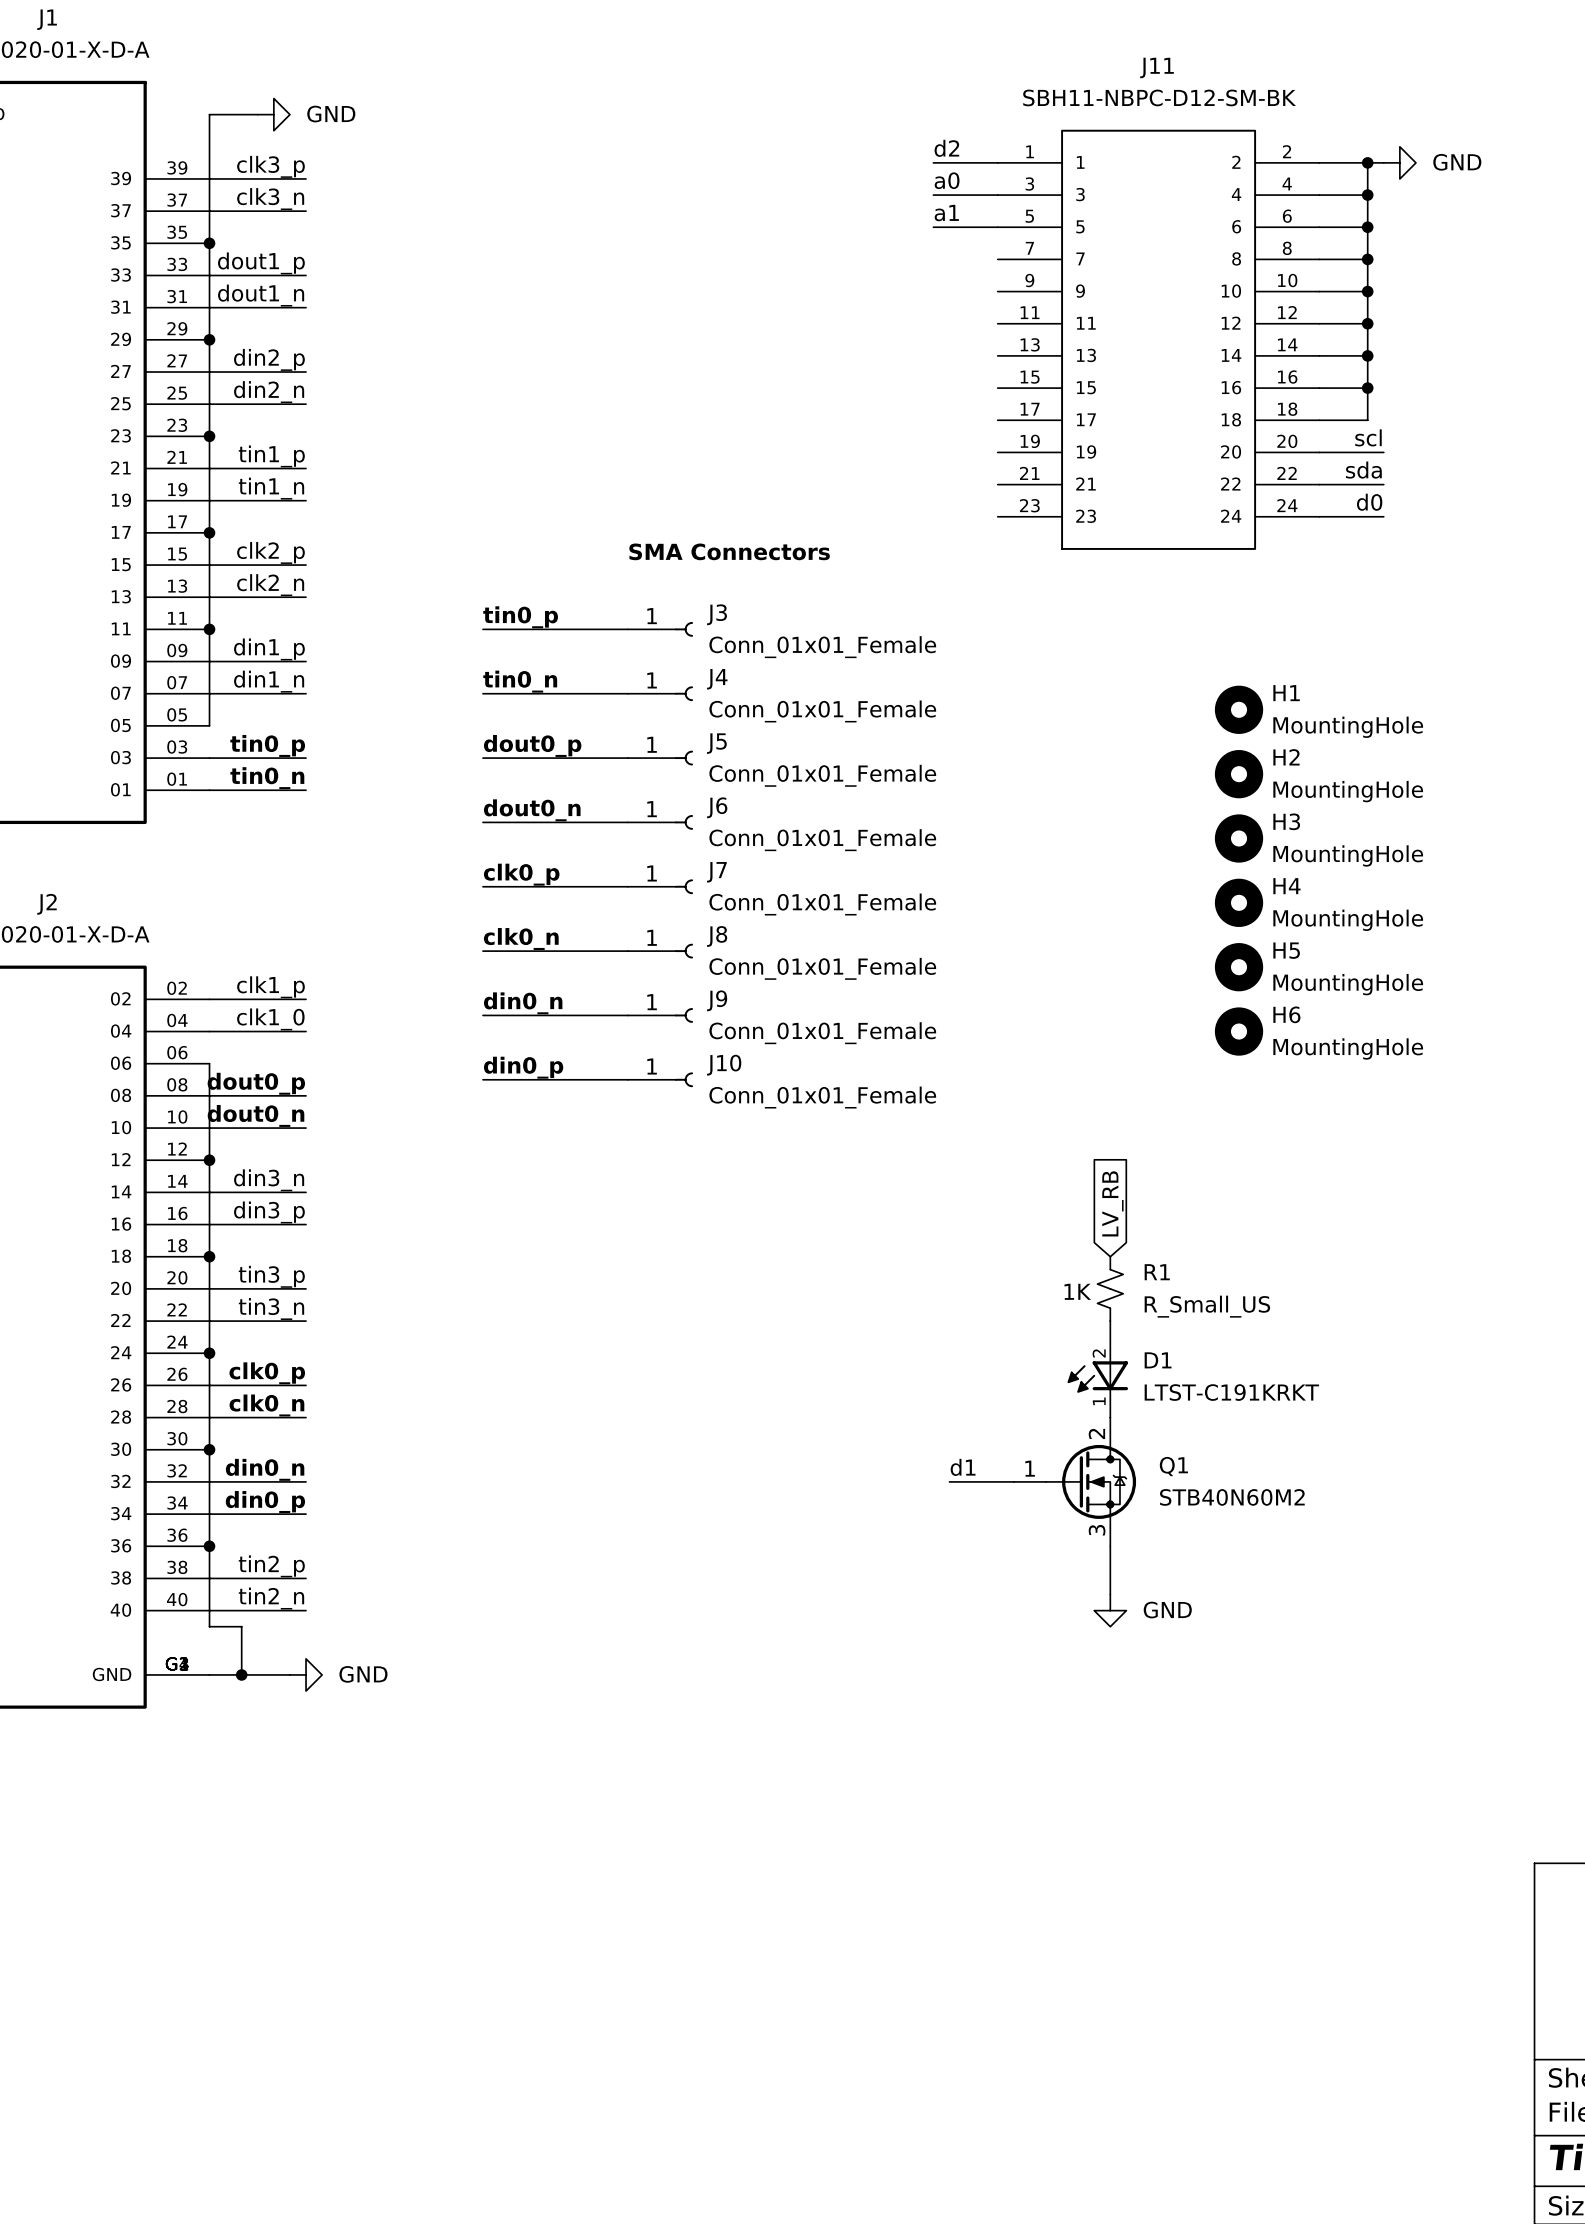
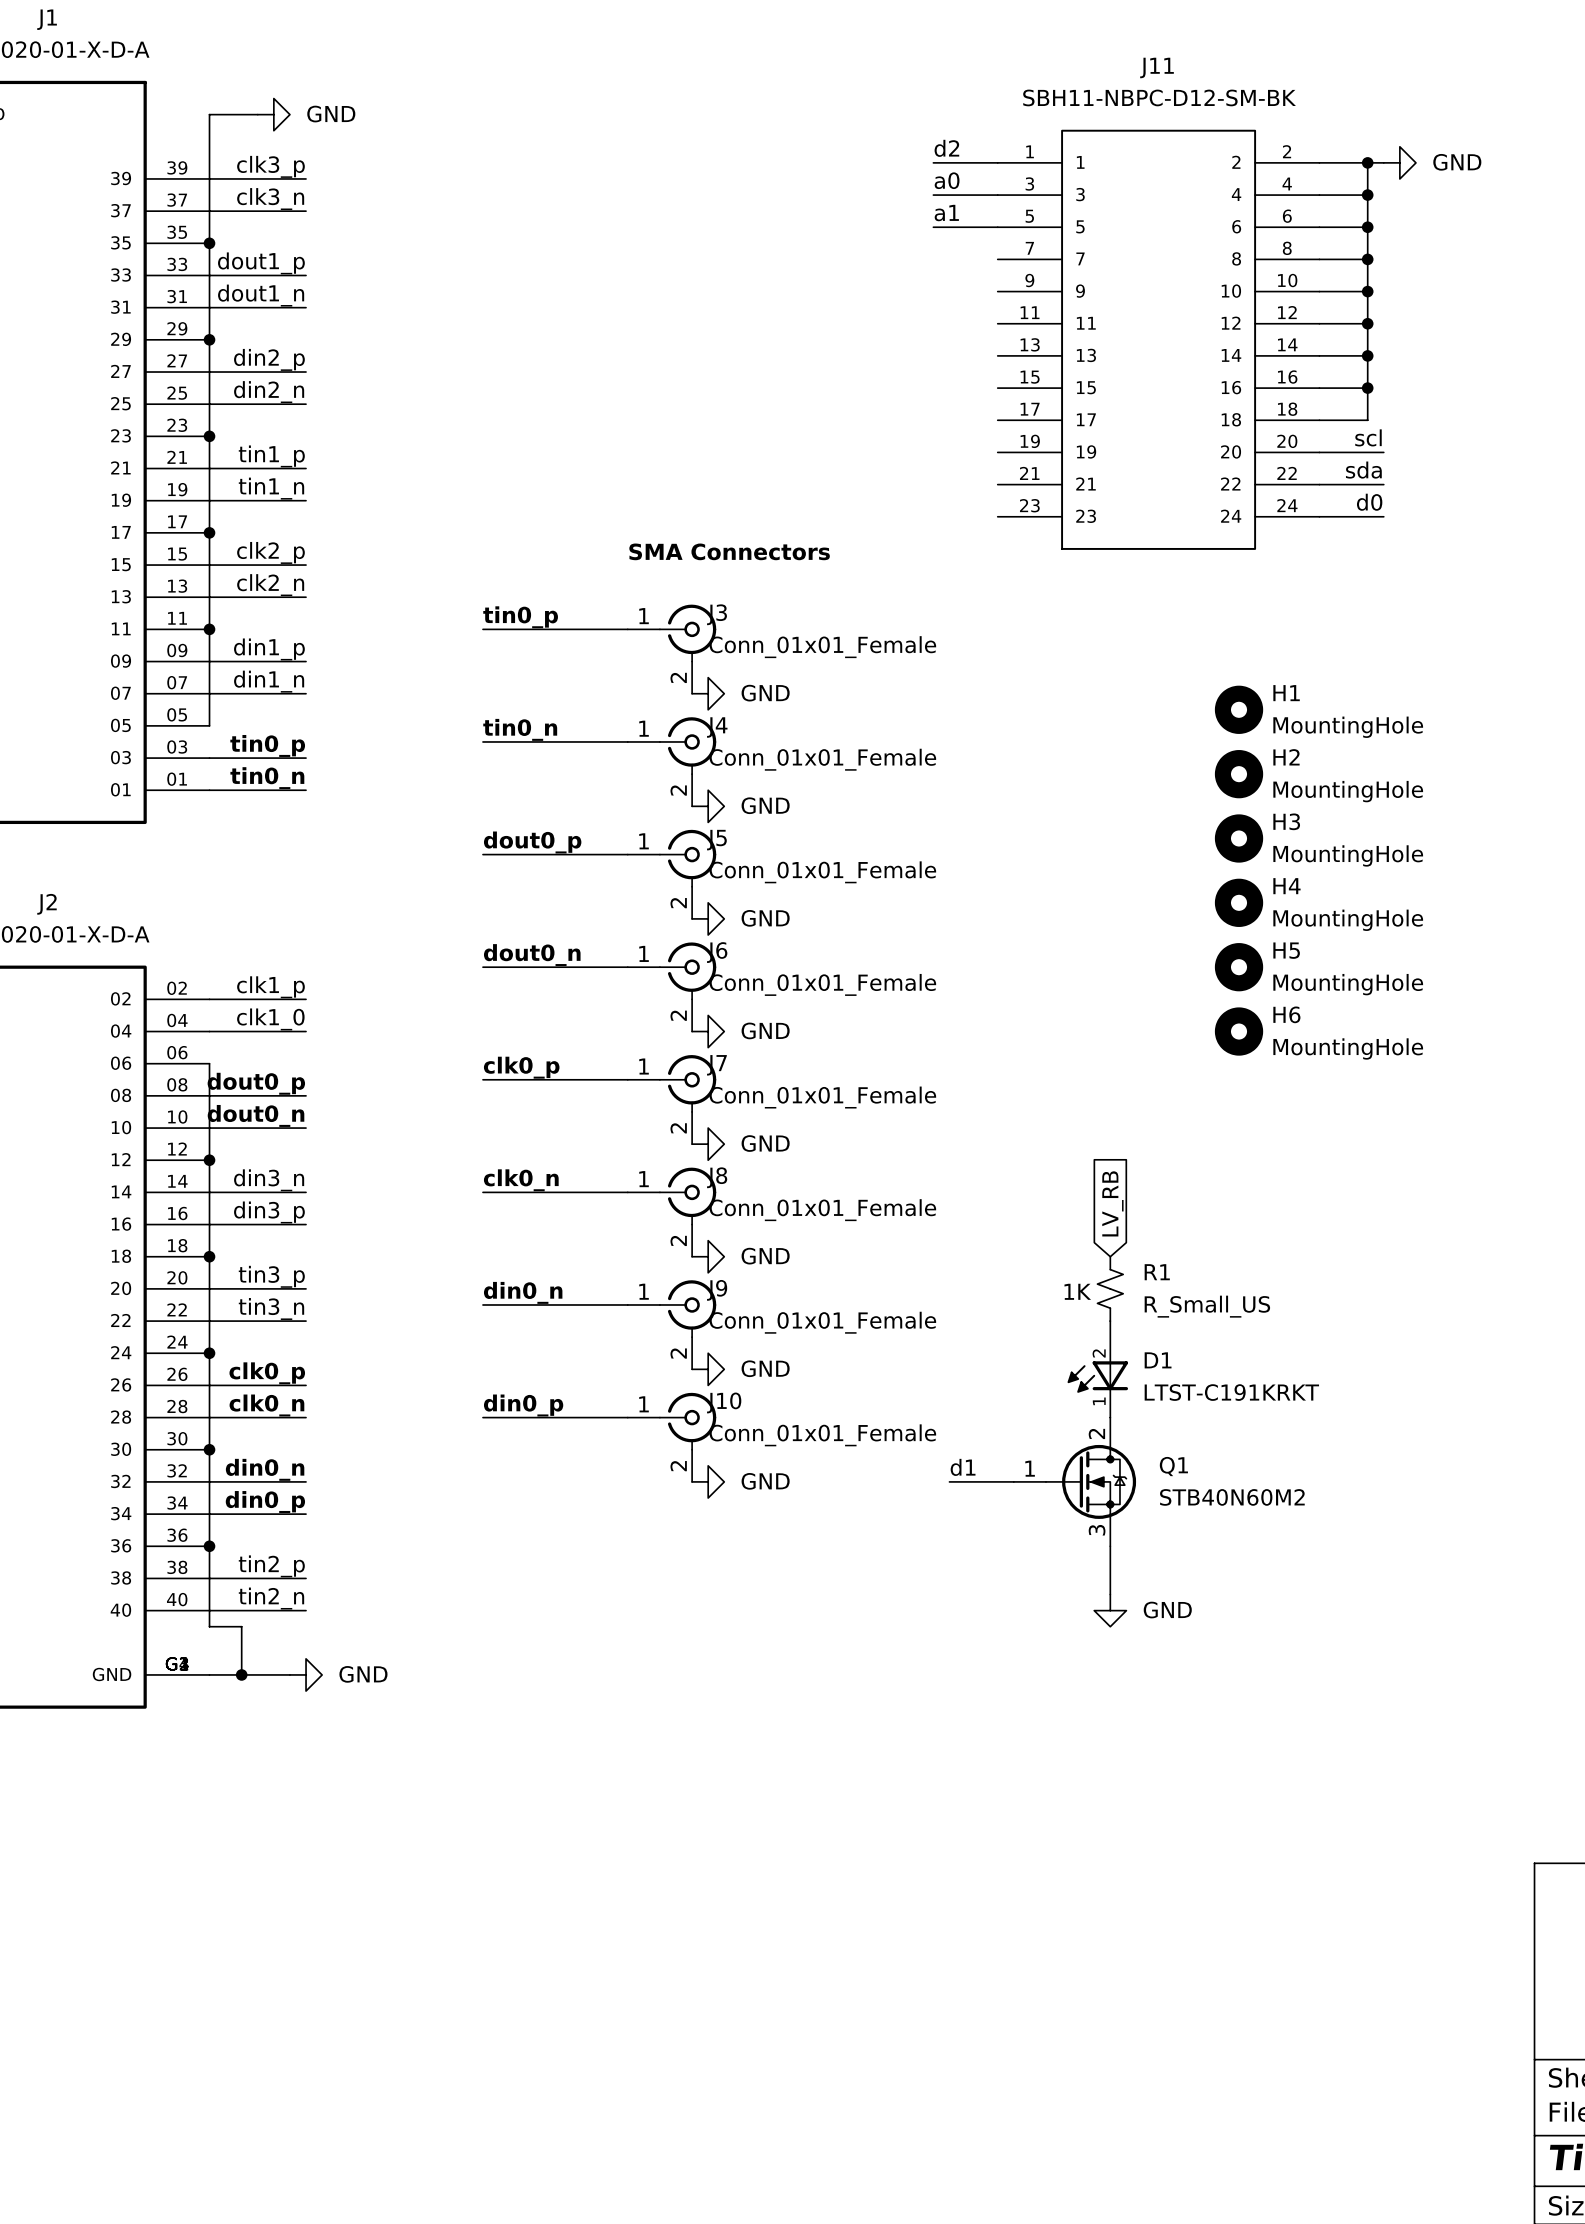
J3 symbol: [627, 621, 694, 637] -> [627, 604, 717, 694]
label position: tin0_n (520, 681) -> tin0_n (520, 729)
J4 symbol: [627, 686, 694, 702] -> [627, 717, 717, 807]
wire: (482, 693) (627, 693) -> none
power symbol: none -> GND (708, 693)
label position: dout0_p (532, 745) -> dout0_p (532, 842)
J5 symbol: [627, 750, 694, 766] -> [627, 829, 717, 919]
wire: (482, 758) (627, 758) -> (482, 741) (627, 741)
power symbol: none -> GND (708, 806)
label position: dout0_n (532, 810) -> dout0_n (532, 955)
J6 symbol: [627, 815, 694, 830] -> [627, 942, 717, 1032]
wire: (482, 822) (627, 822) -> (482, 854) (627, 854)
label: clk0_p (521, 874) -> none
J7 symbol: [627, 879, 694, 895] -> [627, 1055, 717, 1145]
wire: (482, 886) (627, 886) -> none
power symbol: none -> GND (708, 918)
label position: clk0_n (521, 939) -> clk0_n (521, 1180)
J8 symbol: [627, 943, 694, 959] -> [627, 1167, 717, 1257]
wire: (482, 951) (627, 951) -> (482, 967) (627, 967)
label position: din0_n (523, 1003) -> din0_n (523, 1292)
J9 symbol: [627, 1008, 694, 1023] -> [627, 1280, 717, 1370]
wire: (482, 1015) (627, 1015) -> (482, 1192) (627, 1192)
power symbol: none -> GND (708, 1031)
label: din0_p (523, 1067) -> clk0_p (521, 1067)
J10 symbol: [627, 1072, 694, 1088] -> [627, 1392, 717, 1482]
power symbol: none -> GND (708, 1144)
power symbol: none -> GND (708, 1256)
wire: none -> (482, 1304) (627, 1304)
power symbol: none -> GND (708, 1369)
label: none -> din0_p (523, 1405)
wire: none -> (482, 1417) (627, 1417)
power symbol: none -> GND (708, 1481)

